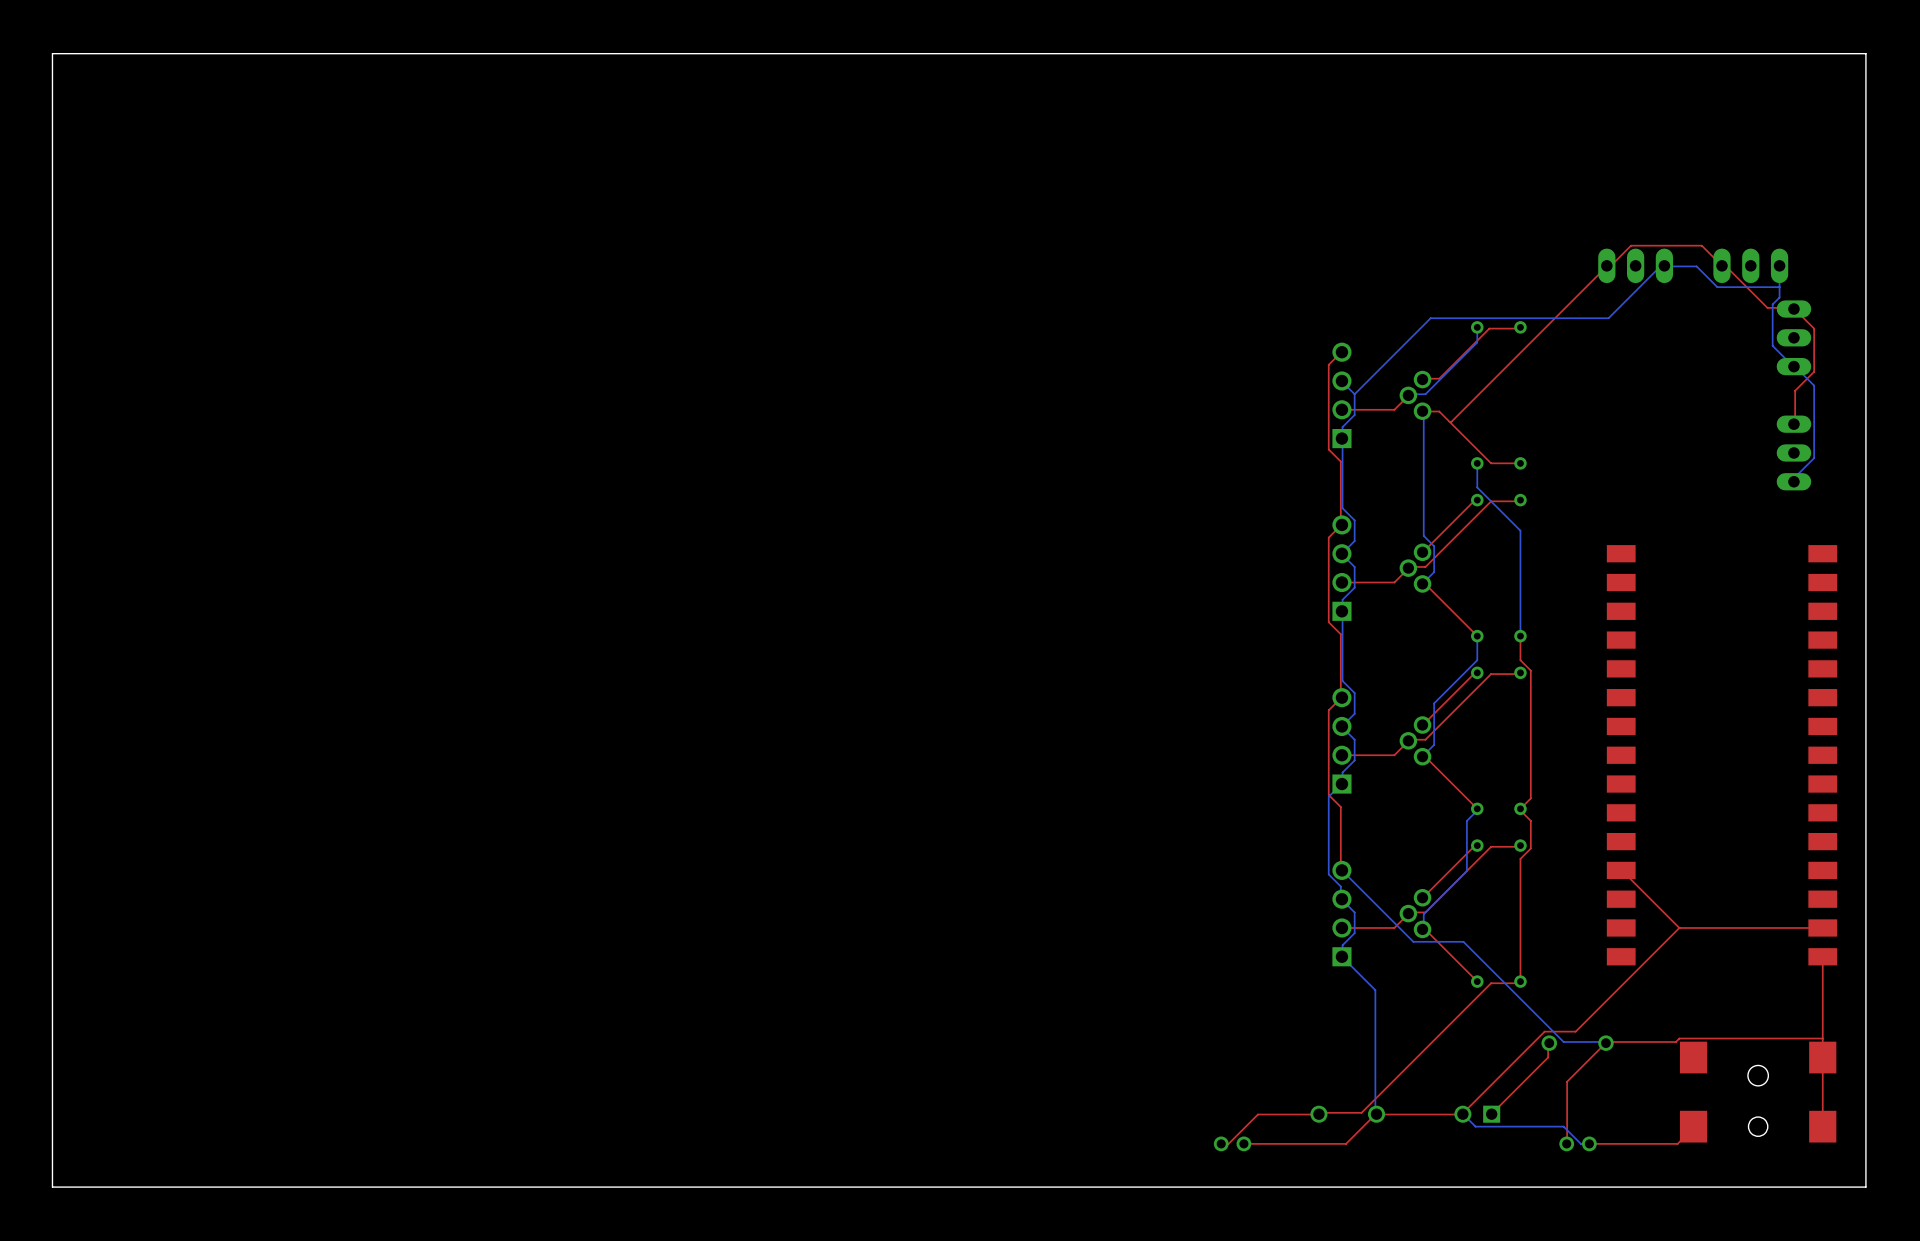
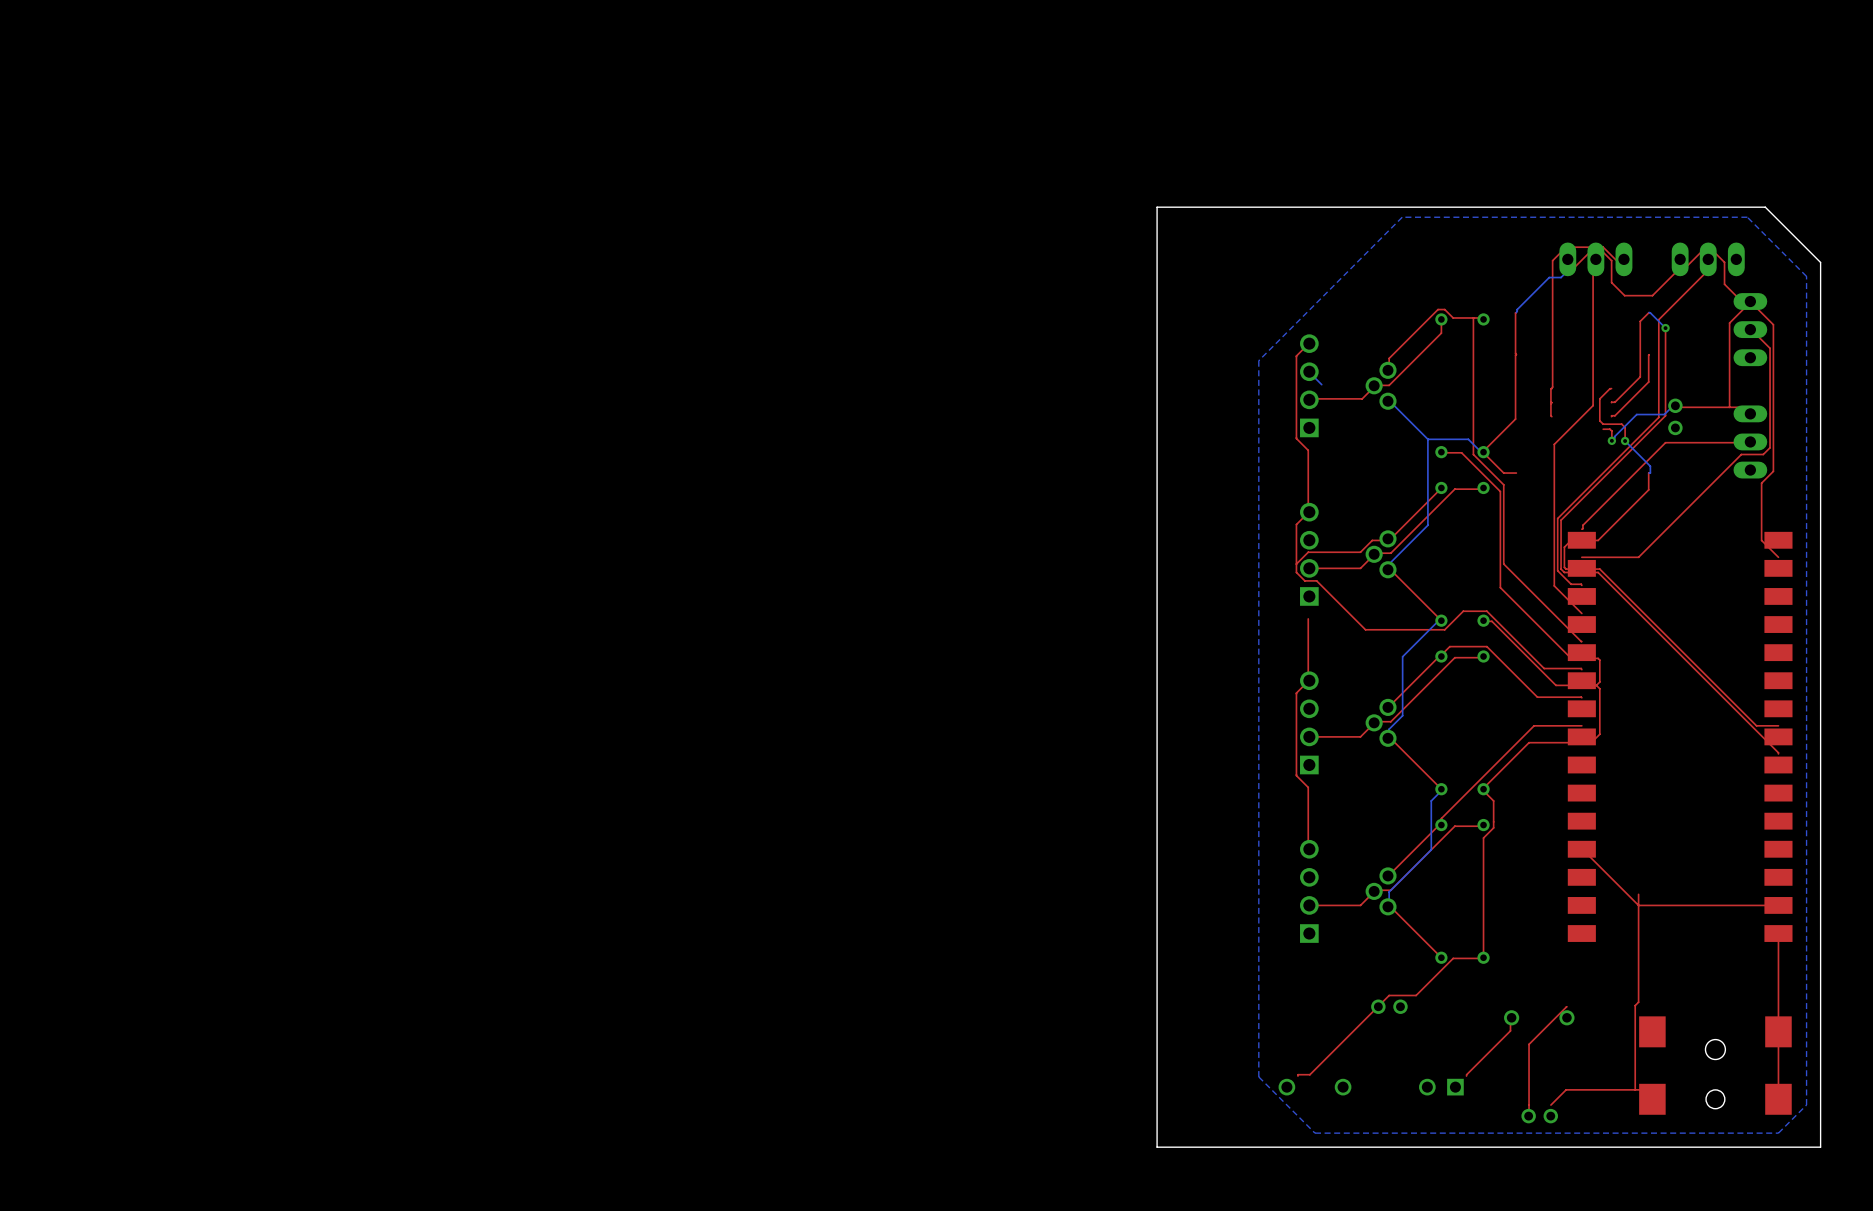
bottom zone outline: none -> (1747, 217) (1806, 276) (1806, 1105) (1778, 1133) (1314, 1133) (1258, 1076) (1258, 360) (1402, 217) (1747, 217)
bottom track: (1779, 265) (1779, 297) (1772, 304) (1772, 345) (1814, 385) (1814, 458) (1795, 477) (1793, 481) -> none
board edge: (1865, 269) (1865, 53) (52, 53) (52, 1187) (1865, 1187) (1865, 1175) -> (1820, 262) (1765, 207) (1157, 207) (1157, 1147) (1820, 1147)
top track: none -> (1567, 270) (1572, 269) (1591, 250) (1601, 250) (1611, 260) (1611, 282) (1624, 295) (1652, 295) (1679, 269) (1684, 269) (1702, 250) (1712, 250) (1724, 262) (1724, 284) (1746, 306) (1750, 301)
bottom track: none -> (1567, 270) (1561, 277) (1549, 277) (1516, 312)
top track: none -> (1595, 270) (1593, 272) (1593, 405) (1554, 444) (1554, 585) (1581, 613)
top track: none -> (1623, 270) (1625, 269) (1603, 247) (1566, 247) (1552, 260) (1551, 416)
top track: none -> (1708, 270) (1658, 319) (1658, 417) (1557, 518) (1557, 570) (1571, 584) (1581, 585)
bottom track: (1779, 287) (1717, 287) (1696, 266) (1664, 265) (1660, 266) (1608, 318) (1430, 318) (1354, 394) (1354, 414) (1342, 427) (1341, 438) (1342, 508) (1354, 520) (1354, 541) (1341, 553) (1354, 566) (1354, 587) (1342, 599) (1341, 611) (1342, 680) (1354, 693) (1354, 713) (1341, 726) (1354, 739) (1354, 760) (1342, 772) (1341, 784) (1328, 796) (1328, 874) (1340, 886) (1340, 898) (1354, 912) (1354, 933) (1342, 945) (1341, 956) (1375, 990) (1376, 1114) -> none
top track: none -> (1750, 301) (1773, 324) (1773, 471) (1761, 483) (1761, 540) (1778, 557)
top track: none -> (1750, 301) (1729, 323) (1729, 407)
top track: none -> (1516, 312) (1515, 419) (1483, 451) (1503, 473) (1516, 473)
top track: none -> (1649, 312) (1640, 321) (1640, 376) (1614, 402) (1611, 402)
bottom track: none -> (1649, 312) (1665, 328)
top track: none -> (1473, 317) (1473, 454) (1503, 484) (1503, 564) (1581, 641)
bottom track: (1477, 327) (1477, 342) (1425, 394) (1408, 395) -> none
top track: (1520, 327) (1489, 328) (1439, 378) (1422, 379) -> (1483, 319) (1453, 317) (1444, 309) (1438, 309) (1389, 358) (1387, 370)
top track: none -> (1665, 328) (1665, 415) (1561, 520) (1561, 569) (1564, 572) (1598, 572) (1778, 753)
via: none -> (1665, 328)
top track: (1814, 356) (1814, 328) (1793, 307) (1767, 307) (1726, 266) (1722, 266) (1701, 245) (1631, 245) (1612, 264) (1606, 264) (1449, 421) -> (1770, 348) (1750, 329)
top track: none -> (1649, 354) (1648, 382) (1614, 415) (1611, 416)
top track: (1814, 371) (1795, 390) (1793, 424) -> (1675, 405) (1675, 407) (1744, 407) (1750, 413)
top track: none -> (1770, 362) (1770, 447) (1763, 454) (1741, 454) (1638, 557) (1581, 557)
top track: (1408, 395) (1394, 409) (1341, 409) -> (1441, 319) (1441, 333) (1389, 385) (1374, 385) (1362, 398) (1309, 399)
top track: none -> (1611, 388) (1599, 398) (1599, 420) (1603, 424) (1621, 424) (1625, 427) (1625, 441)
top track: (1422, 411) (1439, 411) (1491, 463) (1520, 463) -> none
bottom track: (1422, 411) (1423, 535) (1434, 546) (1434, 572) (1422, 583) -> (1427, 439) (1427, 525) (1389, 564) (1387, 569)
bottom track: none -> (1387, 401) (1427, 439)
bottom track: none -> (1675, 405) (1674, 404) (1664, 414) (1636, 414) (1611, 440)
part: none -> (1675, 416)
top track: none -> (1603, 429) (1611, 431) (1611, 440)
bottom track: none -> (1427, 439) (1468, 439) (1483, 452)
via: none -> (1611, 440)
bottom track: none -> (1625, 441) (1650, 466) (1649, 473)
via: none -> (1625, 441)
top track: none -> (1750, 441) (1665, 442) (1582, 525) (1581, 529)
top track: none -> (1441, 452) (1461, 452) (1500, 491) (1500, 587) (1571, 658) (1598, 658) (1599, 660) (1599, 682) (1596, 685)
bottom track: (1477, 463) (1477, 487) (1520, 530) (1520, 636) -> none
top track: none -> (1649, 473) (1648, 489) (1598, 540) (1571, 540) (1564, 547) (1564, 567) (1566, 569) (1599, 569) (1756, 725) (1778, 725)
top track: (1477, 500) (1473, 501) (1422, 552) -> (1441, 488) (1389, 540) (1387, 538) (1387, 540) (1372, 540) (1360, 552) (1308, 552) (1296, 564)
top track: (1328, 586) (1328, 622) (1340, 634) -> (1296, 572) (1304, 580) (1316, 580) (1365, 629) (1444, 629) (1463, 611) (1486, 611) (1544, 668) (1581, 669)
bottom track: (1477, 636) (1477, 660) (1434, 703) (1434, 744) (1422, 756) -> (1441, 621) (1438, 621) (1402, 656) (1402, 715) (1389, 729) (1387, 738)
top track: (1520, 636) (1520, 660) (1530, 670) (1530, 798) (1520, 808) -> (1596, 685) (1599, 688) (1599, 734) (1591, 742) (1529, 742) (1483, 789)
top track: none -> (1483, 621) (1491, 621) (1556, 685) (1596, 685)
top track: none -> (1441, 656) (1449, 646) (1486, 646) (1537, 697) (1581, 697)
top track: none -> (1581, 725) (1534, 725) (1441, 818) (1441, 825)
bottom track: (1341, 870) (1413, 941) (1463, 941) (1563, 1041) (1605, 1043) -> none
top track: none -> (1638, 894) (1638, 1002) (1635, 1005) (1635, 1089)
top track: (1679, 927) (1575, 1031) (1544, 1031) (1462, 1114) (1376, 1114) (1346, 1143) (1243, 1143) -> none
top track: (1520, 982) (1491, 983) (1361, 1112) (1257, 1114) (1228, 1143) (1221, 1143) -> (1483, 958) (1453, 958) (1416, 995) (1389, 995) (1309, 1074) (1297, 1076)
top track: (1822, 1038) (1679, 1038) (1675, 1041) (1606, 1041) (1567, 1081) -> (1566, 1006) (1529, 1044) (1529, 1055)
top track: (1548, 1056) (1491, 1114) -> (1510, 1030) (1466, 1076)
bottom track: (1462, 1114) (1475, 1126) (1563, 1126) (1580, 1143) (1589, 1143) -> none
top track: none -> (1652, 1088) (1652, 1089) (1566, 1089) (1550, 1105)
top track: (1693, 1126) (1677, 1143) (1589, 1143) -> none
part position: (1232, 1143) -> (1389, 1006)

